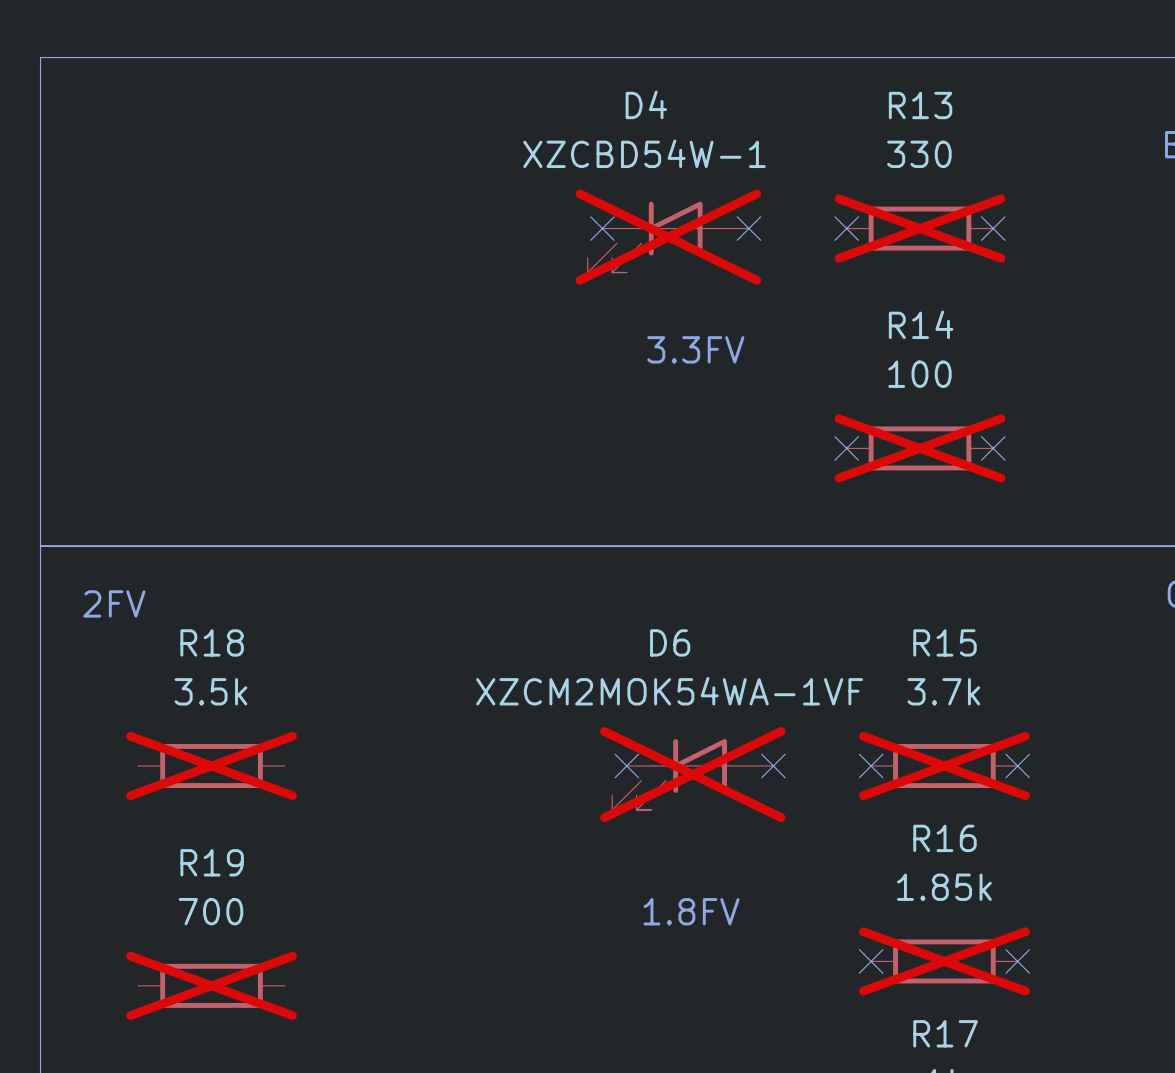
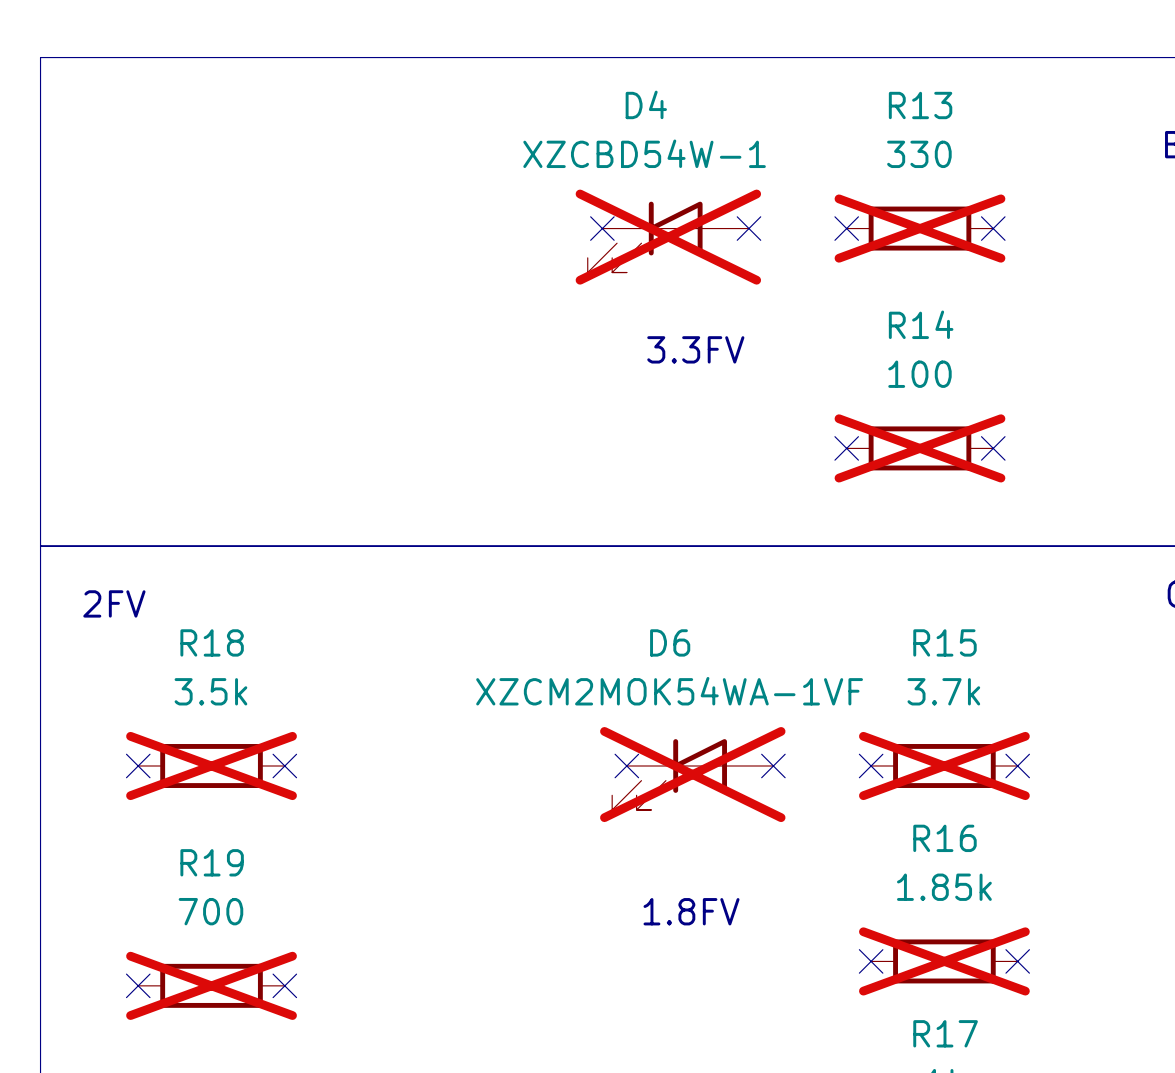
no-connect mark: none -> (138, 766)
no-connect mark: none -> (284, 766)
no-connect mark: none -> (138, 985)
no-connect mark: none -> (284, 985)

